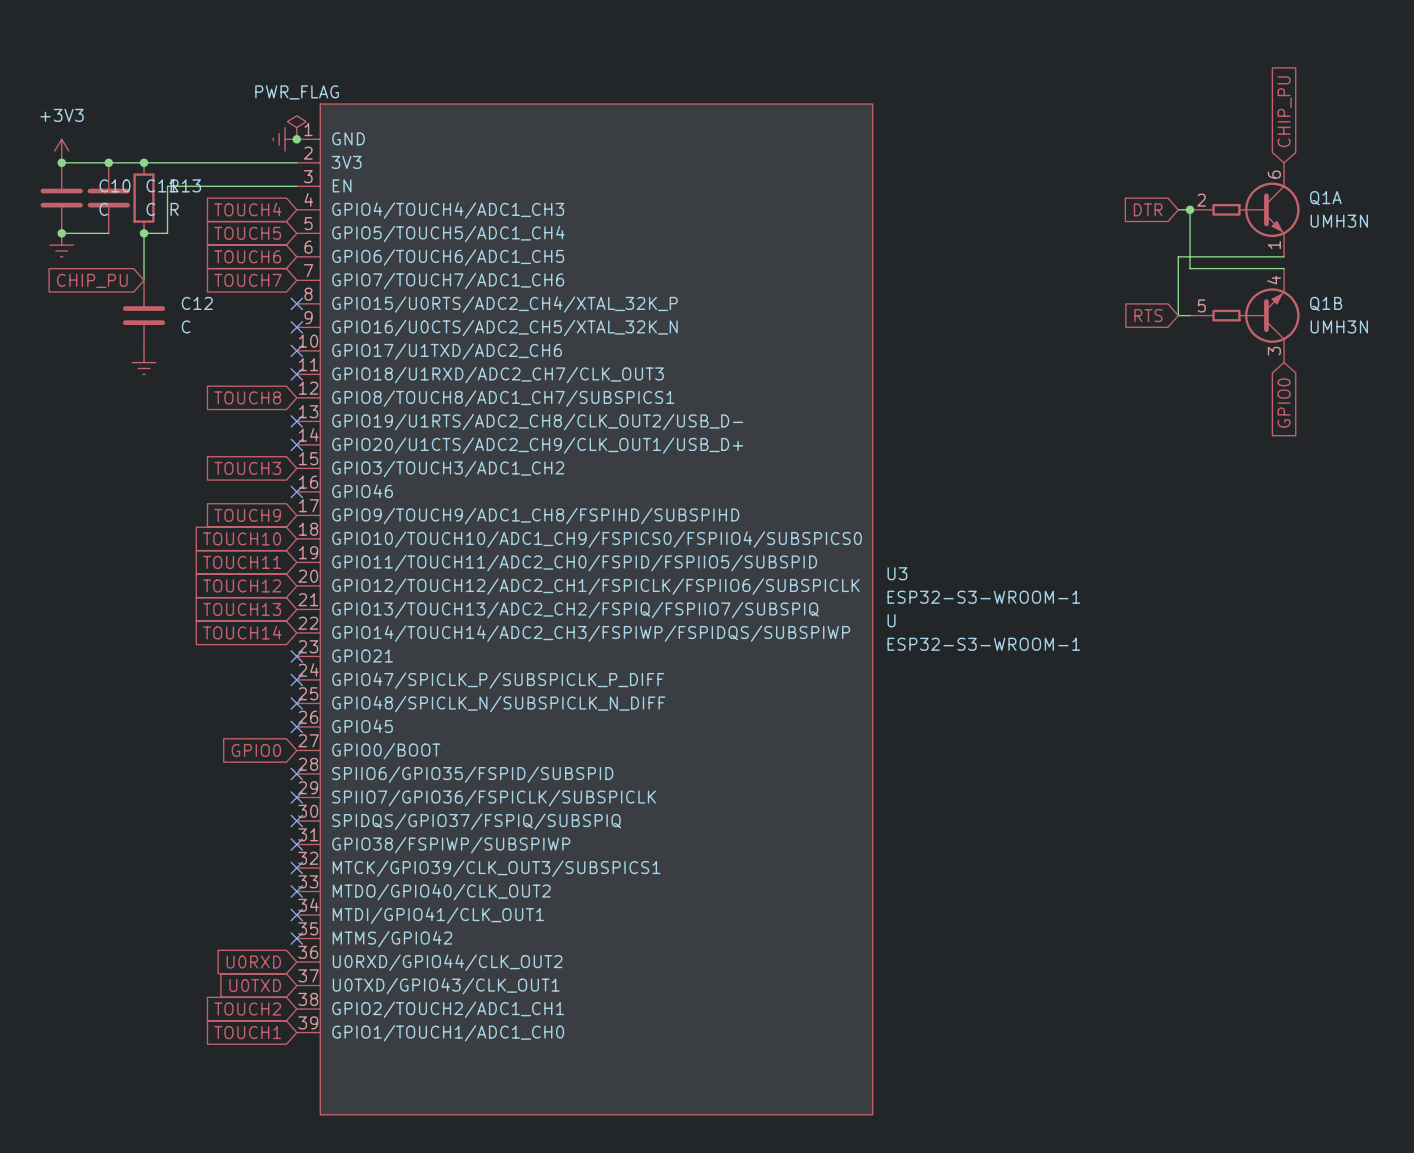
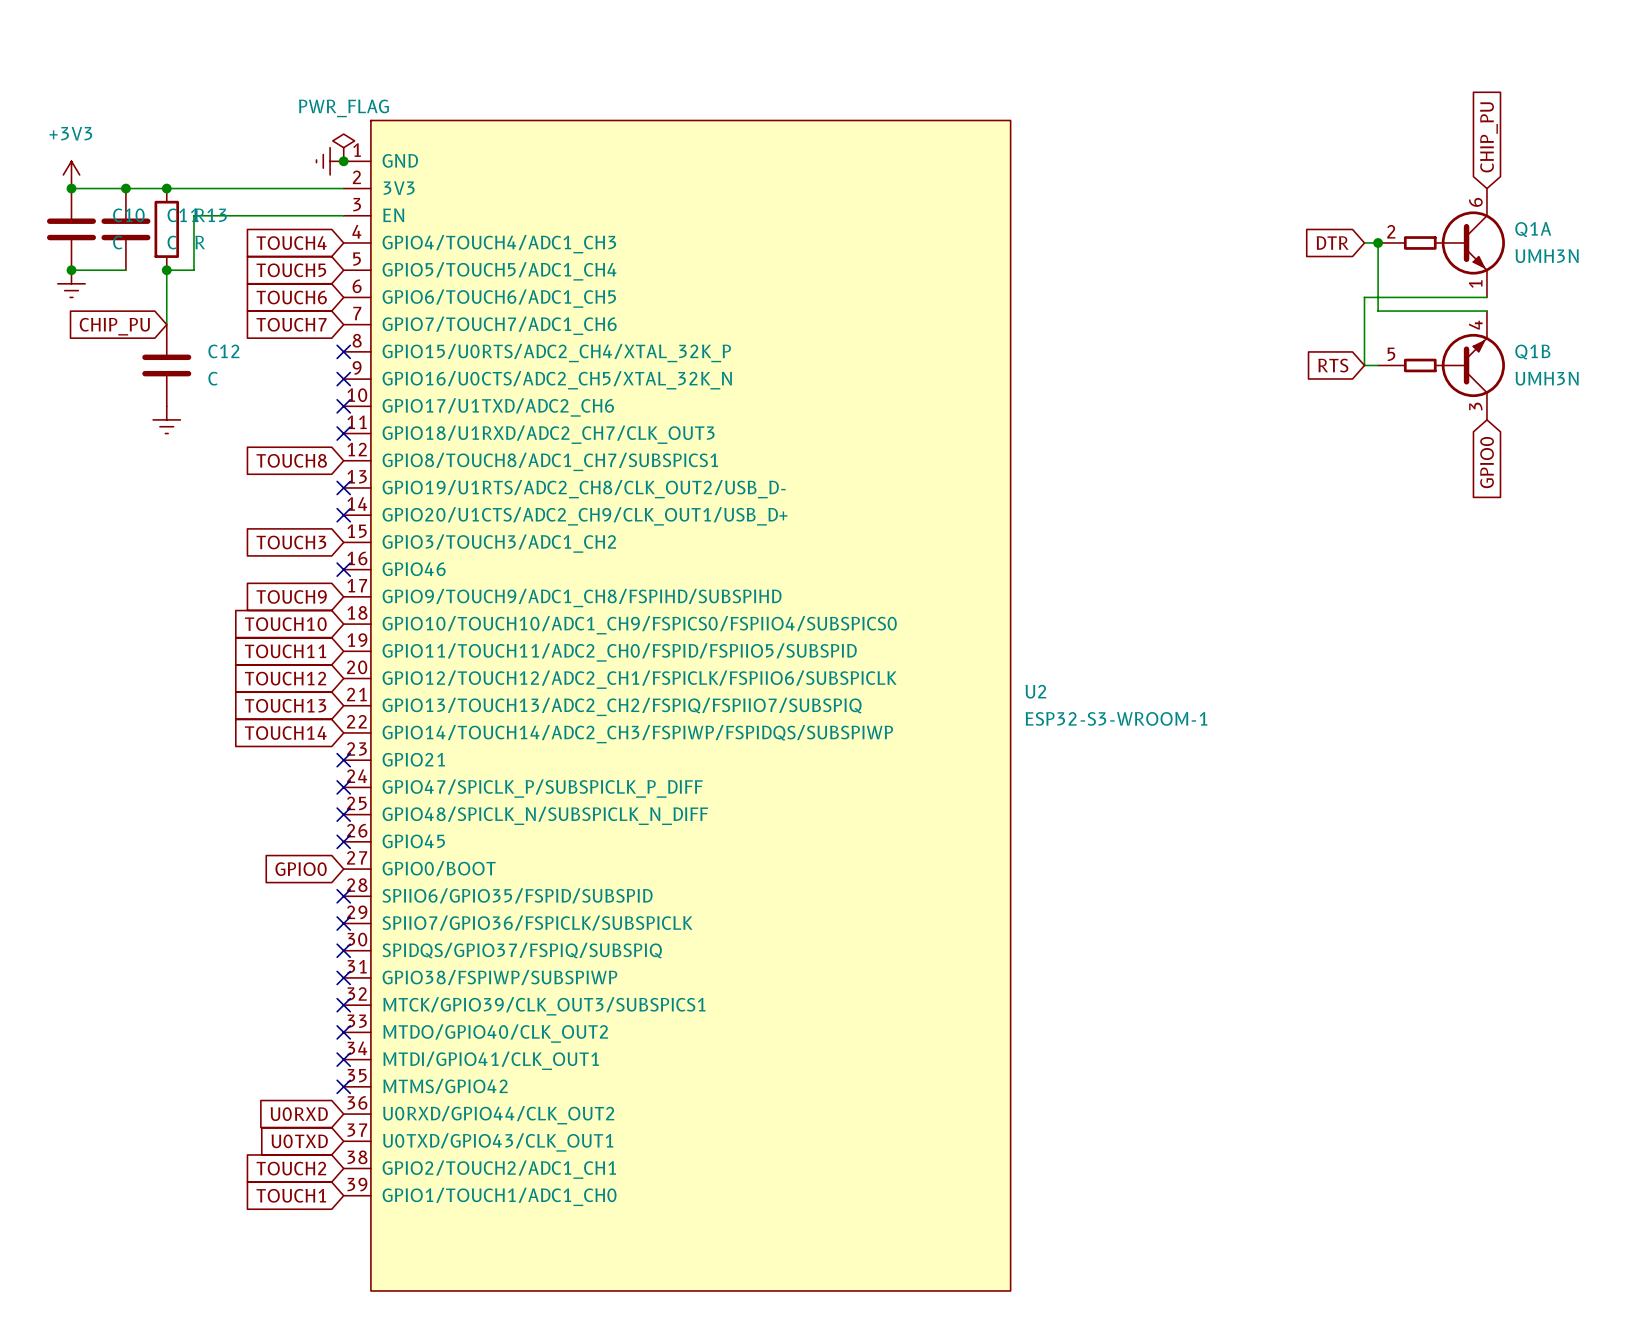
U3 name: U3 (897, 573) -> U2 (1035, 691)
U3 value position: ESP32-S3-WROOM-1 (983, 597) -> ESP32-S3-WROOM-1 (1116, 718)
U3 text: U (891, 620) -> none
U3 text: ESP32-S3-WROOM-1 (983, 644) -> none

